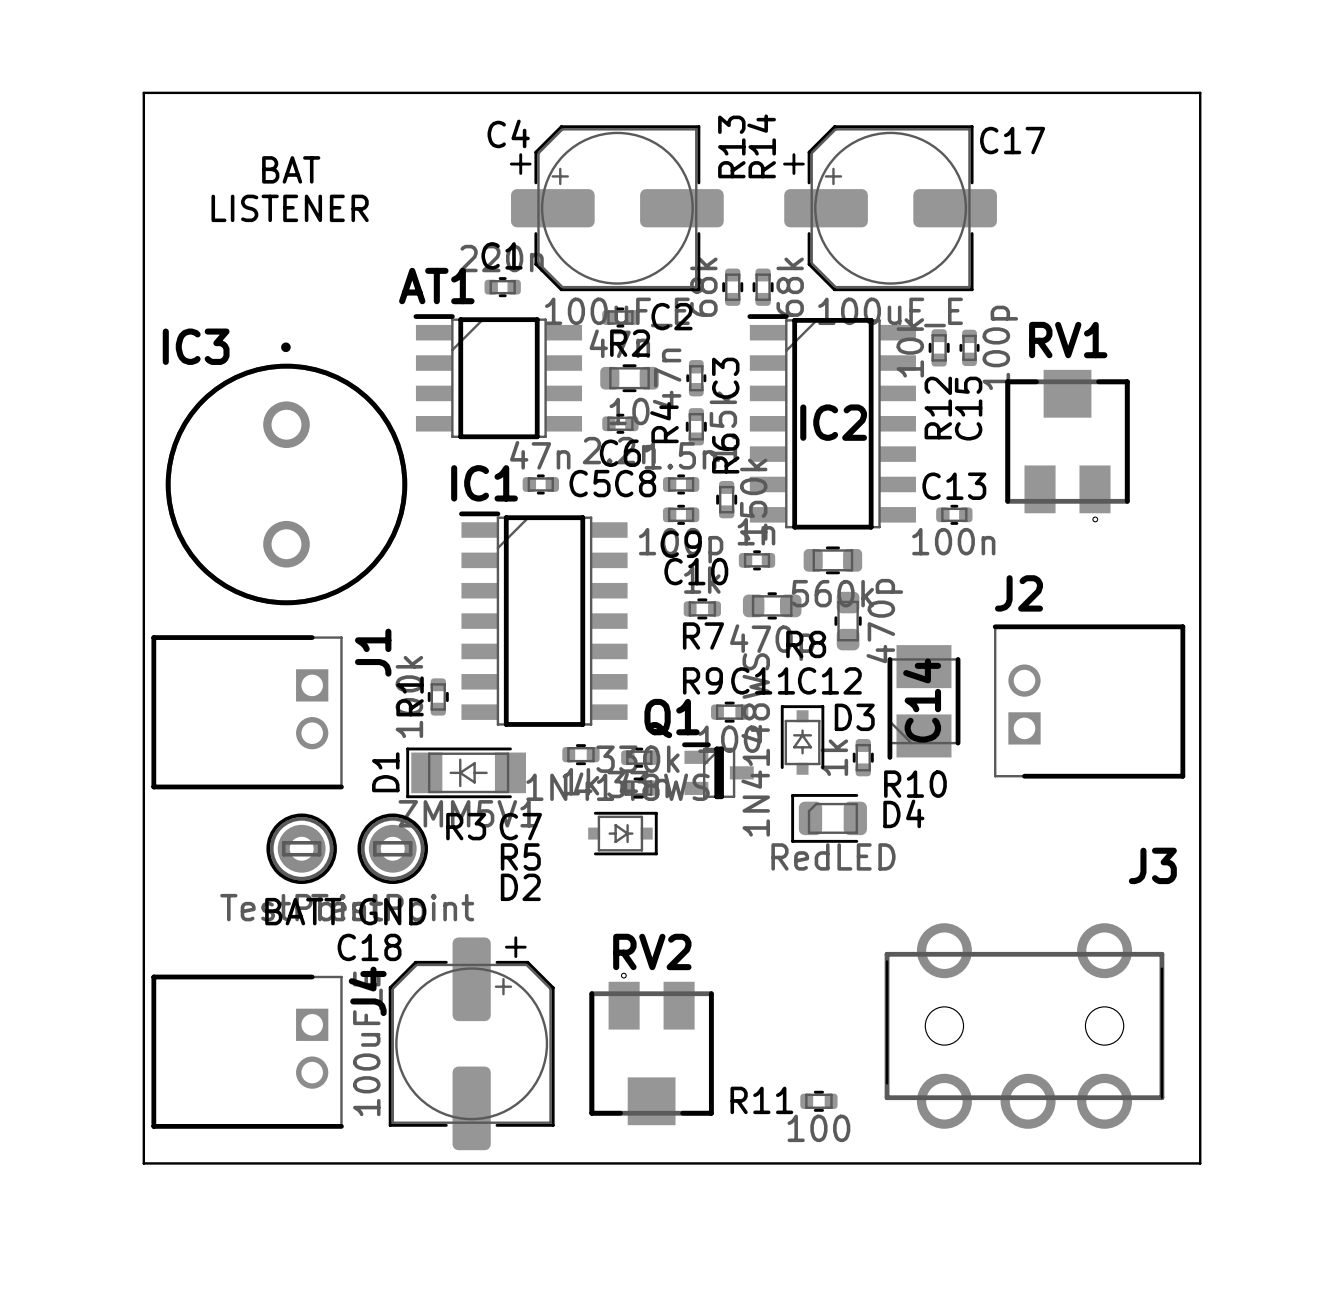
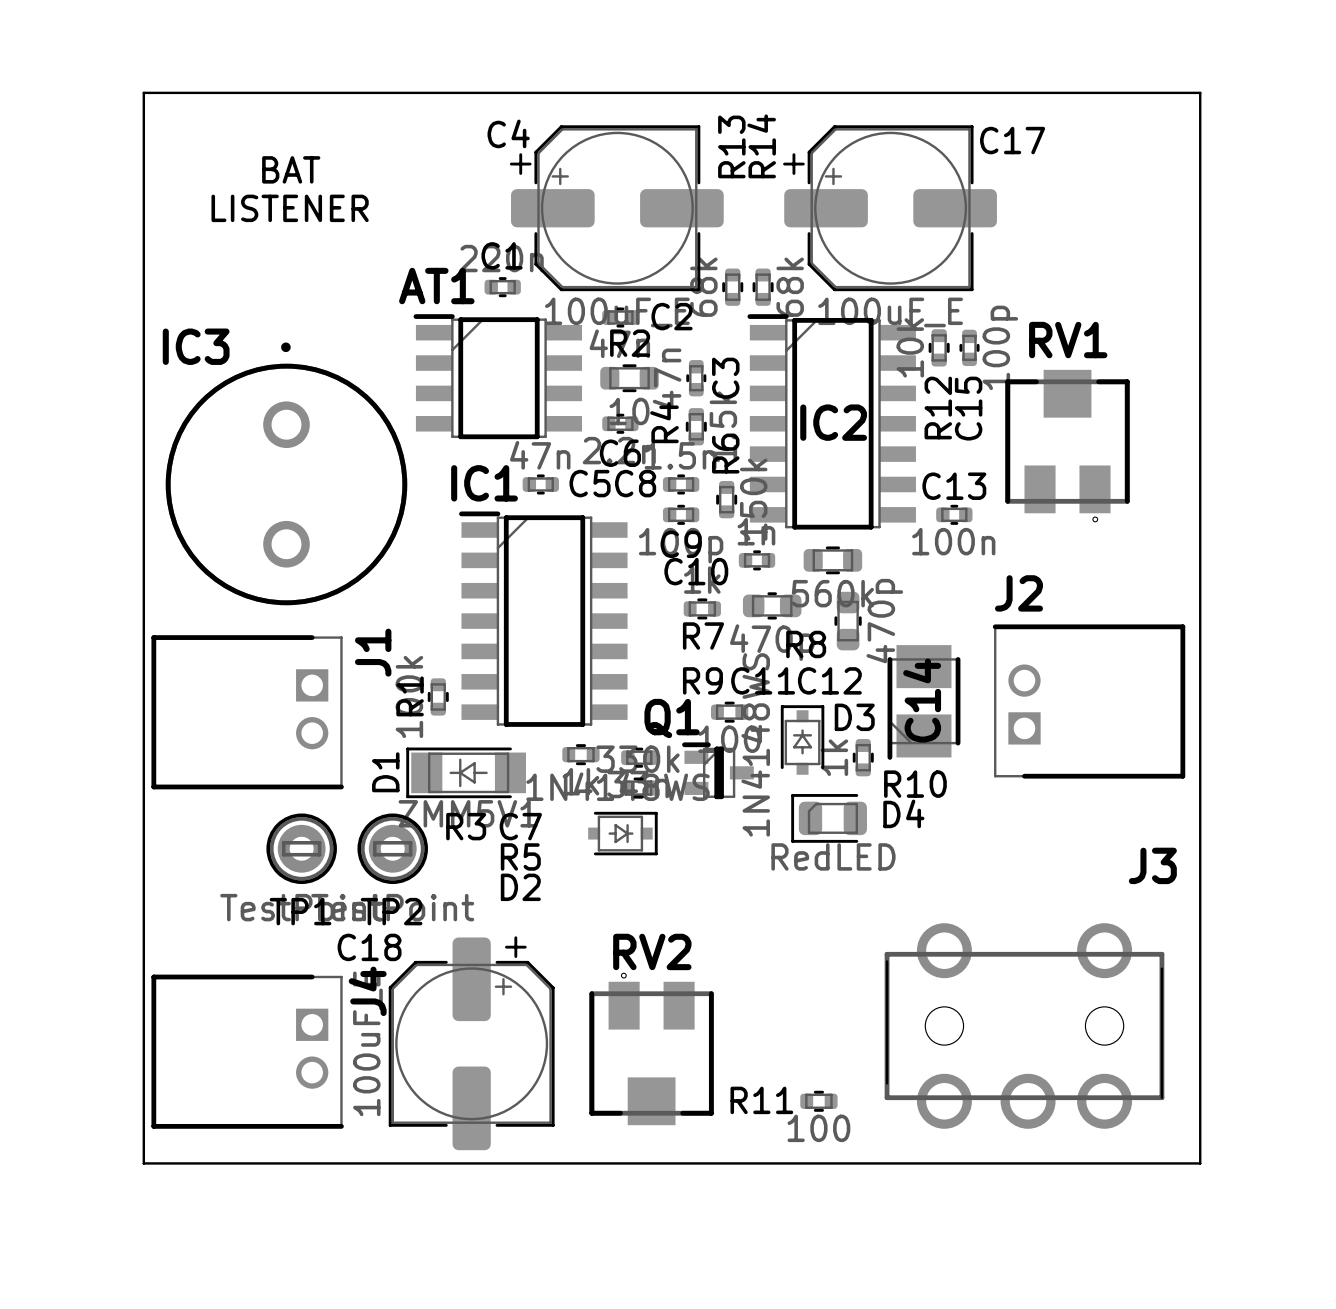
BATT name: BATT (303, 911) -> TP1 (300, 911)
GND name: GND (392, 911) -> TP2 (391, 911)

